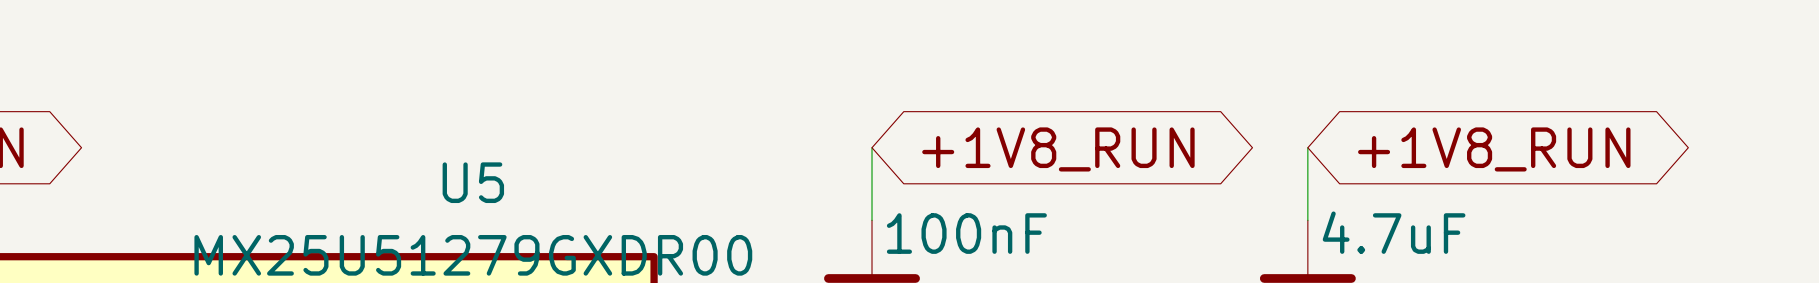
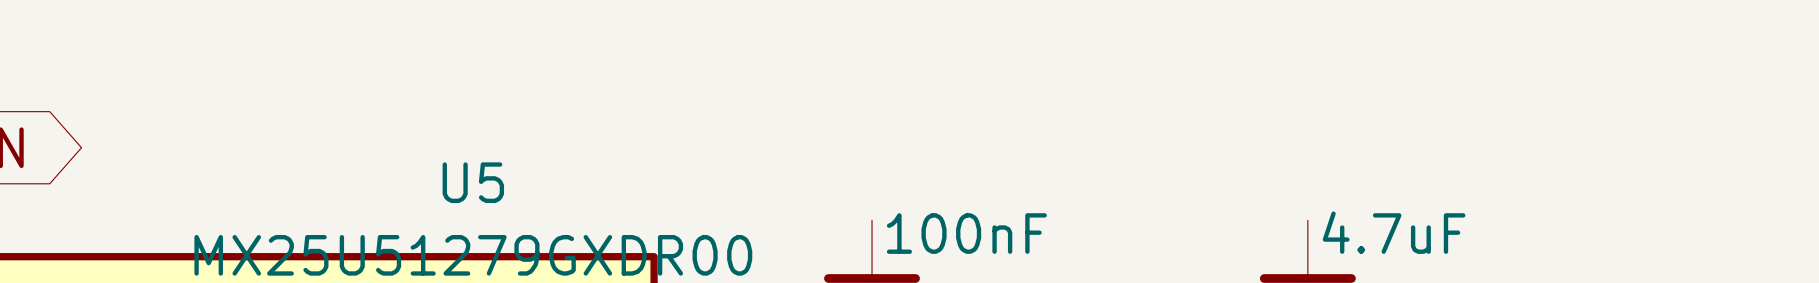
wire: (872, 147) (872, 220) -> none
wire: (1307, 147) (1307, 220) -> none
global label: +1V8_RUN (1058, 149) -> none
global label: +1V8_RUN (1494, 149) -> none

